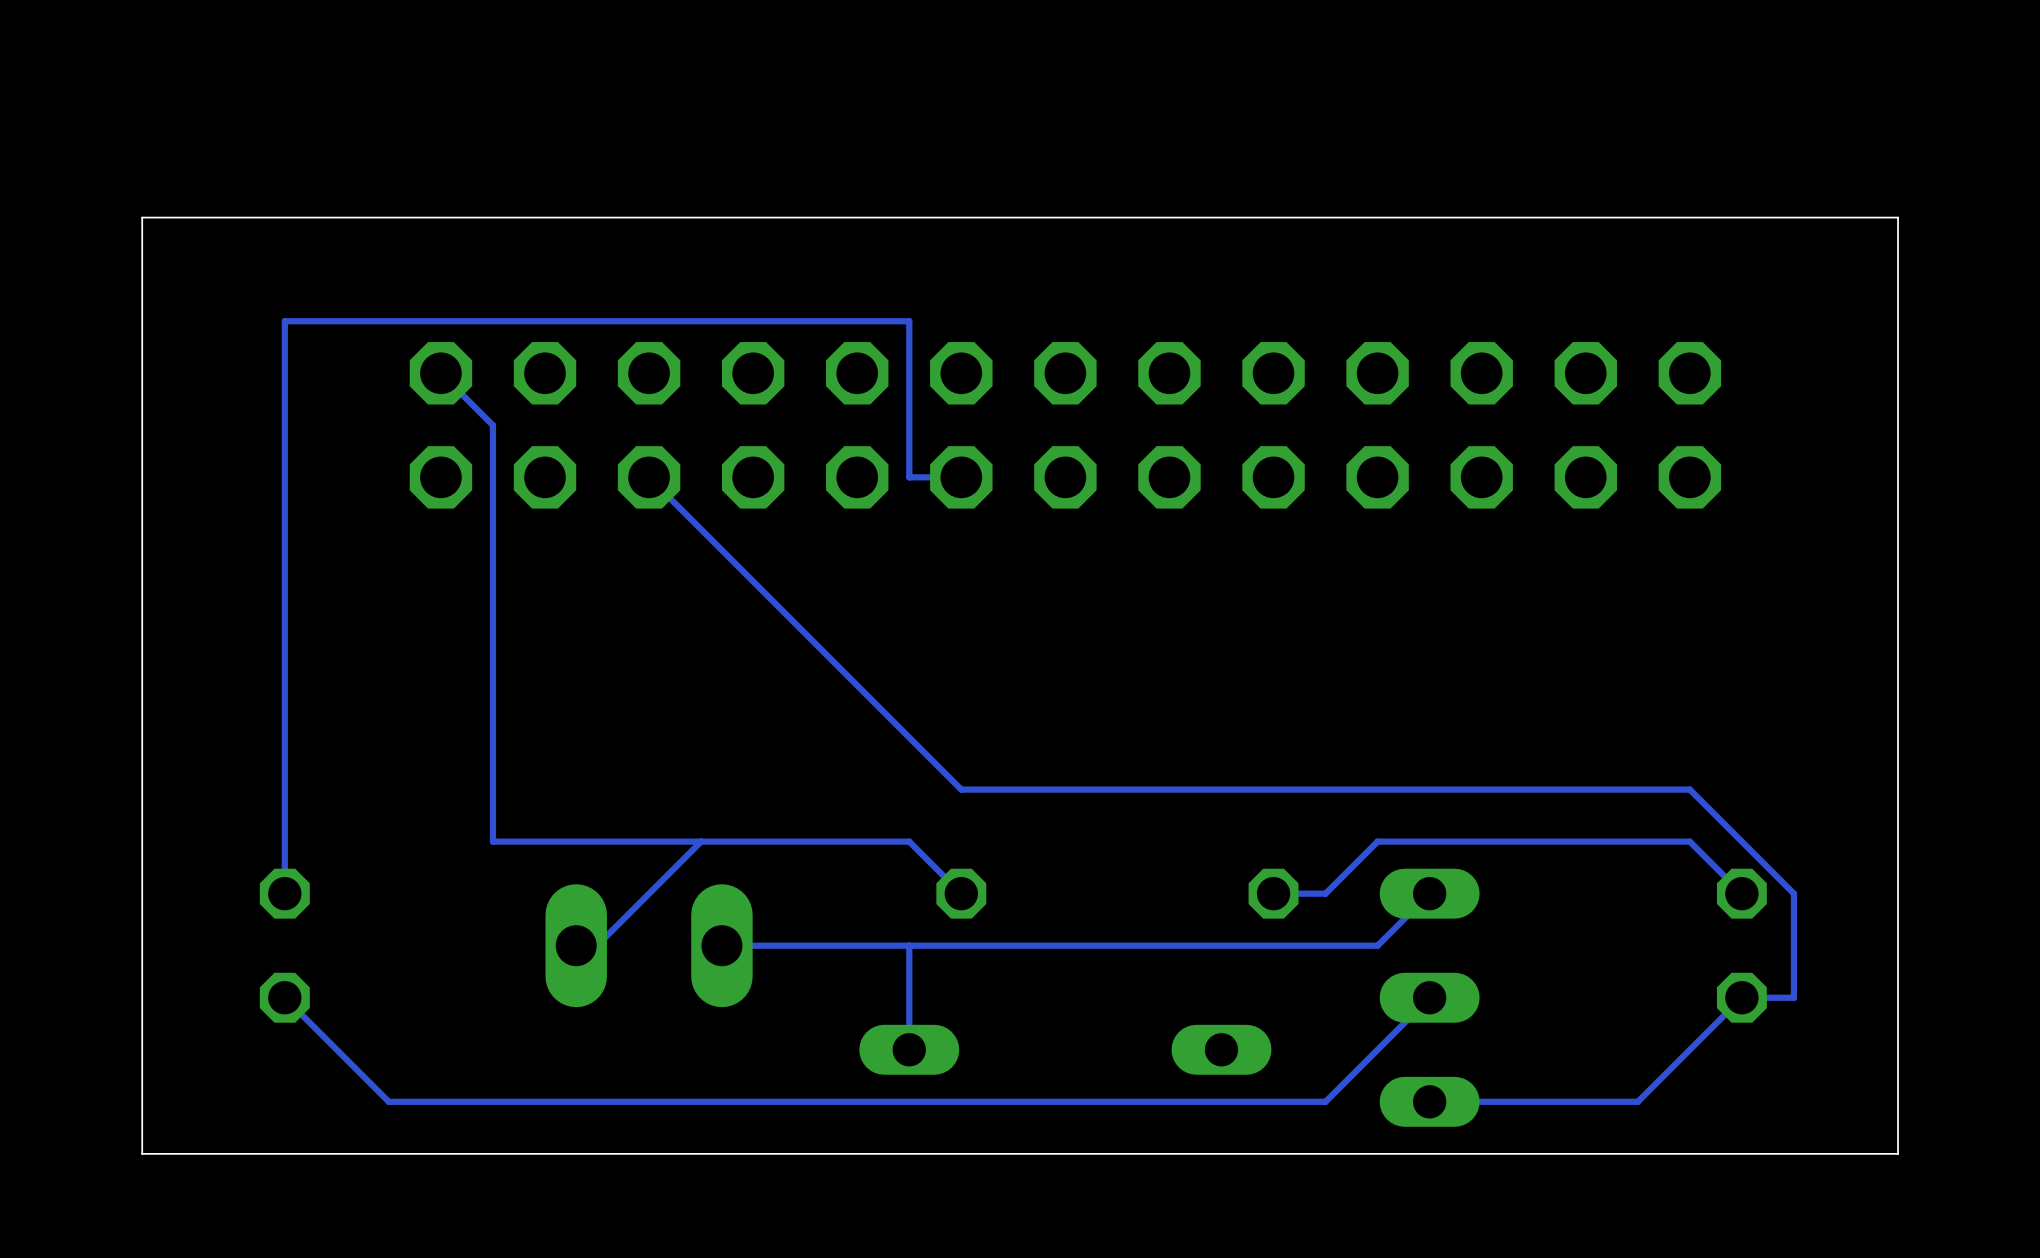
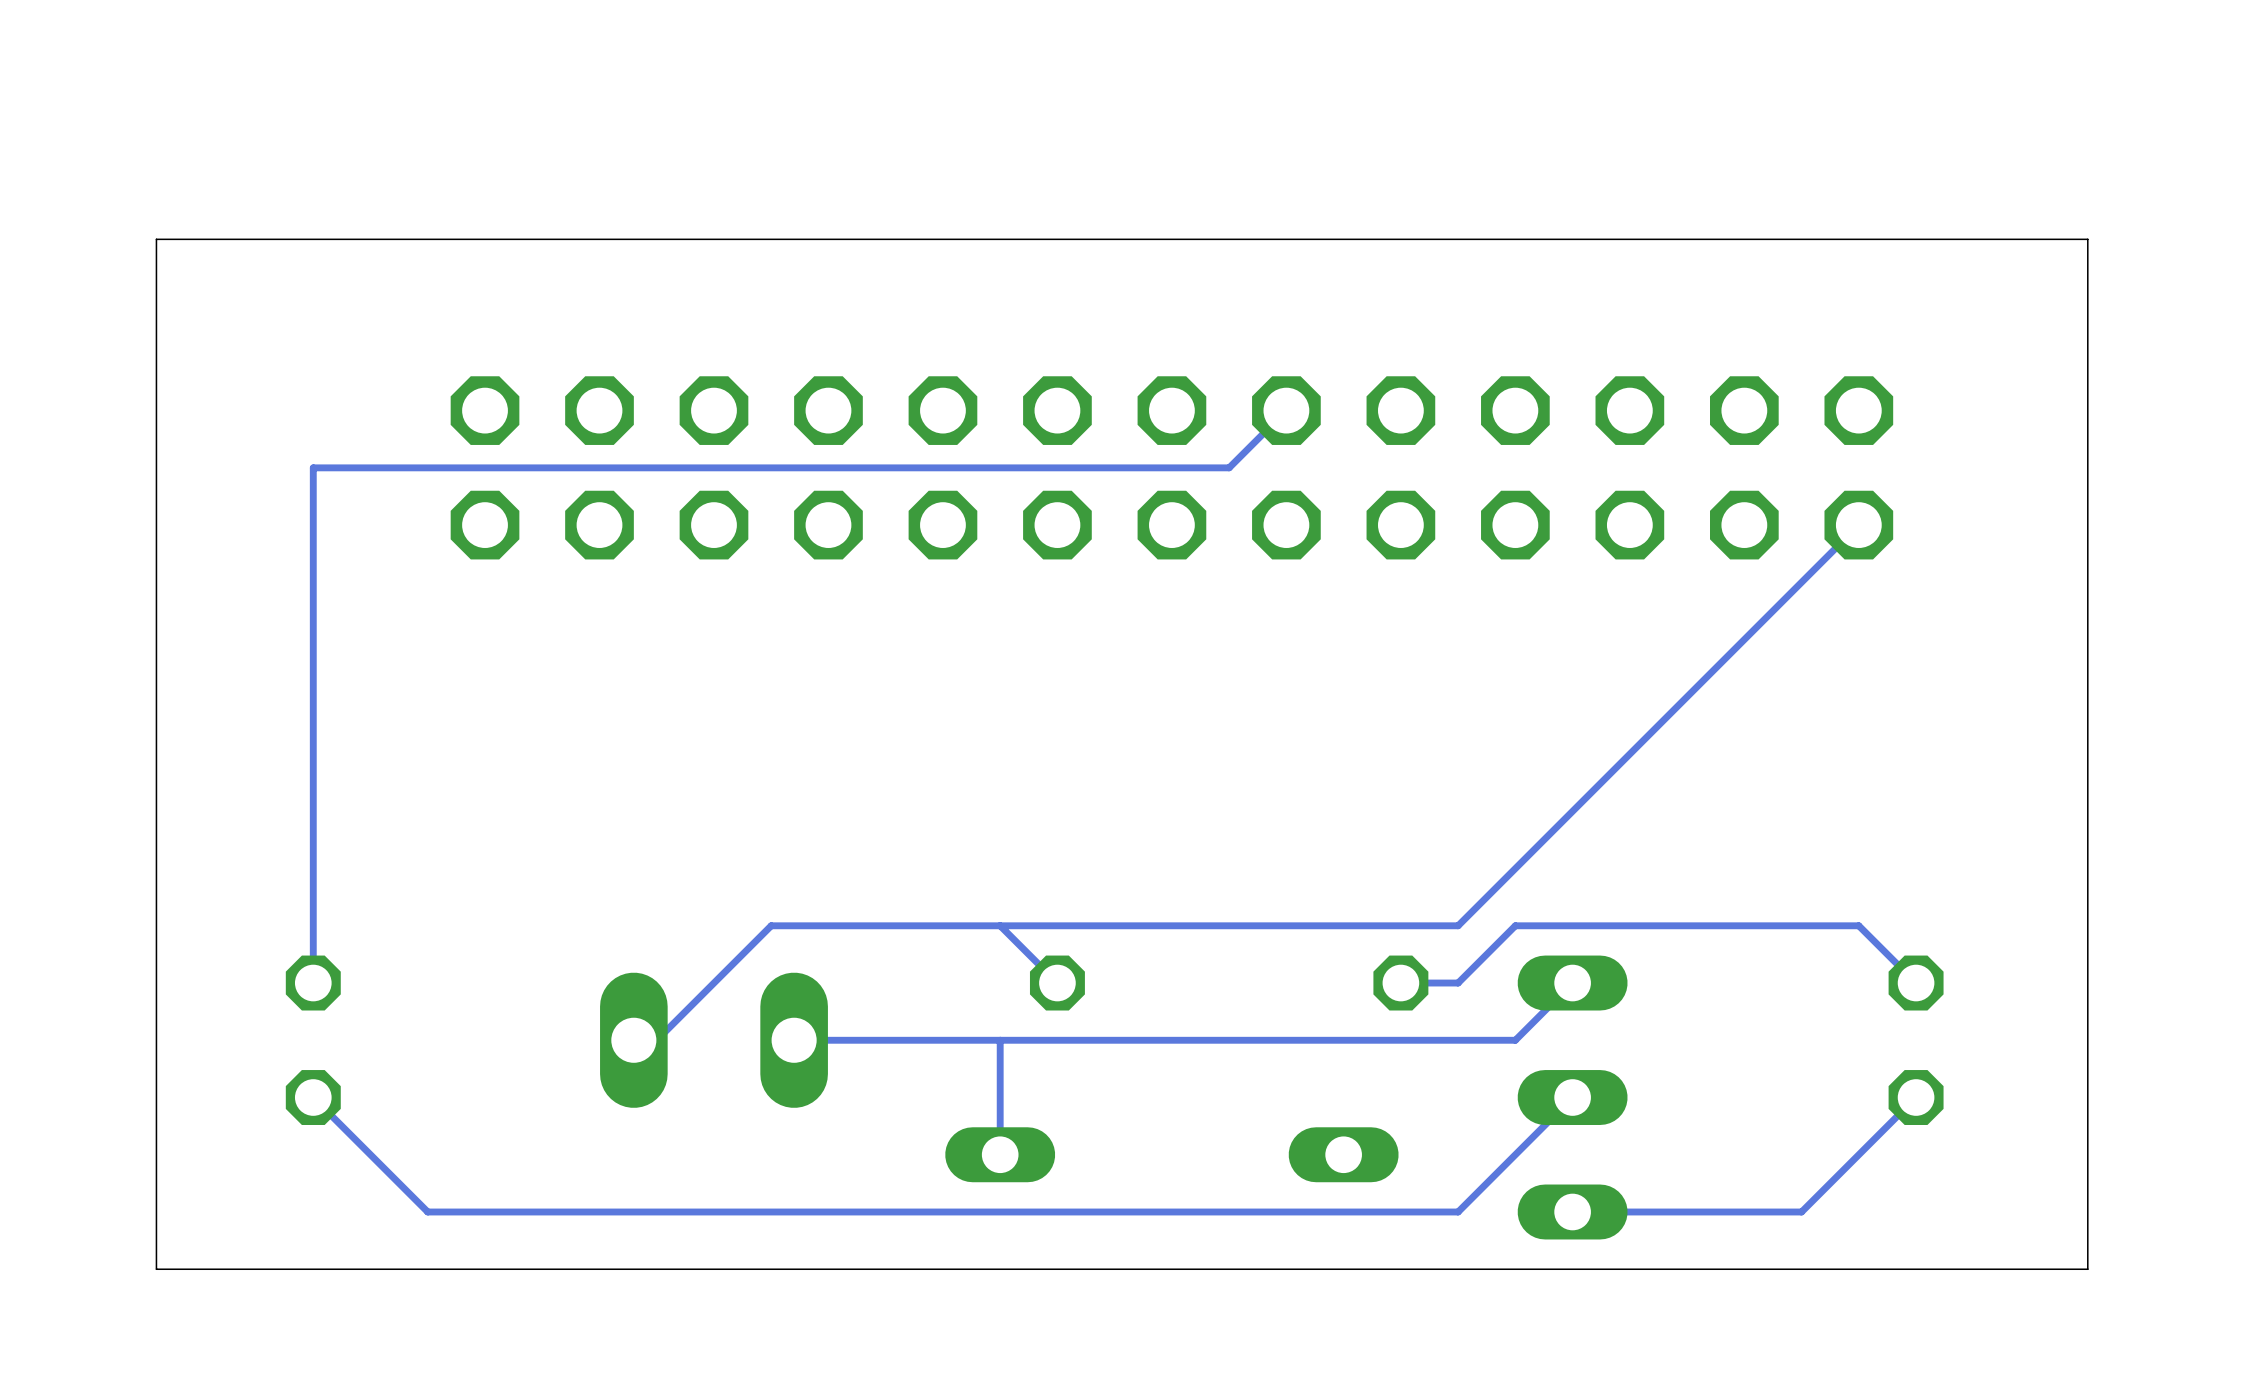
track: (440, 373) (492, 425) (492, 841) (701, 841) -> none
track: (284, 425) (284, 321) (909, 321) (909, 477) (961, 477) -> (313, 467) (1229, 467) (1286, 410)
track: (649, 477) (961, 789) (1689, 789) (1793, 893) (1793, 997) (1741, 997) -> none
track: none -> (1858, 525) (1458, 925) (1000, 925)

